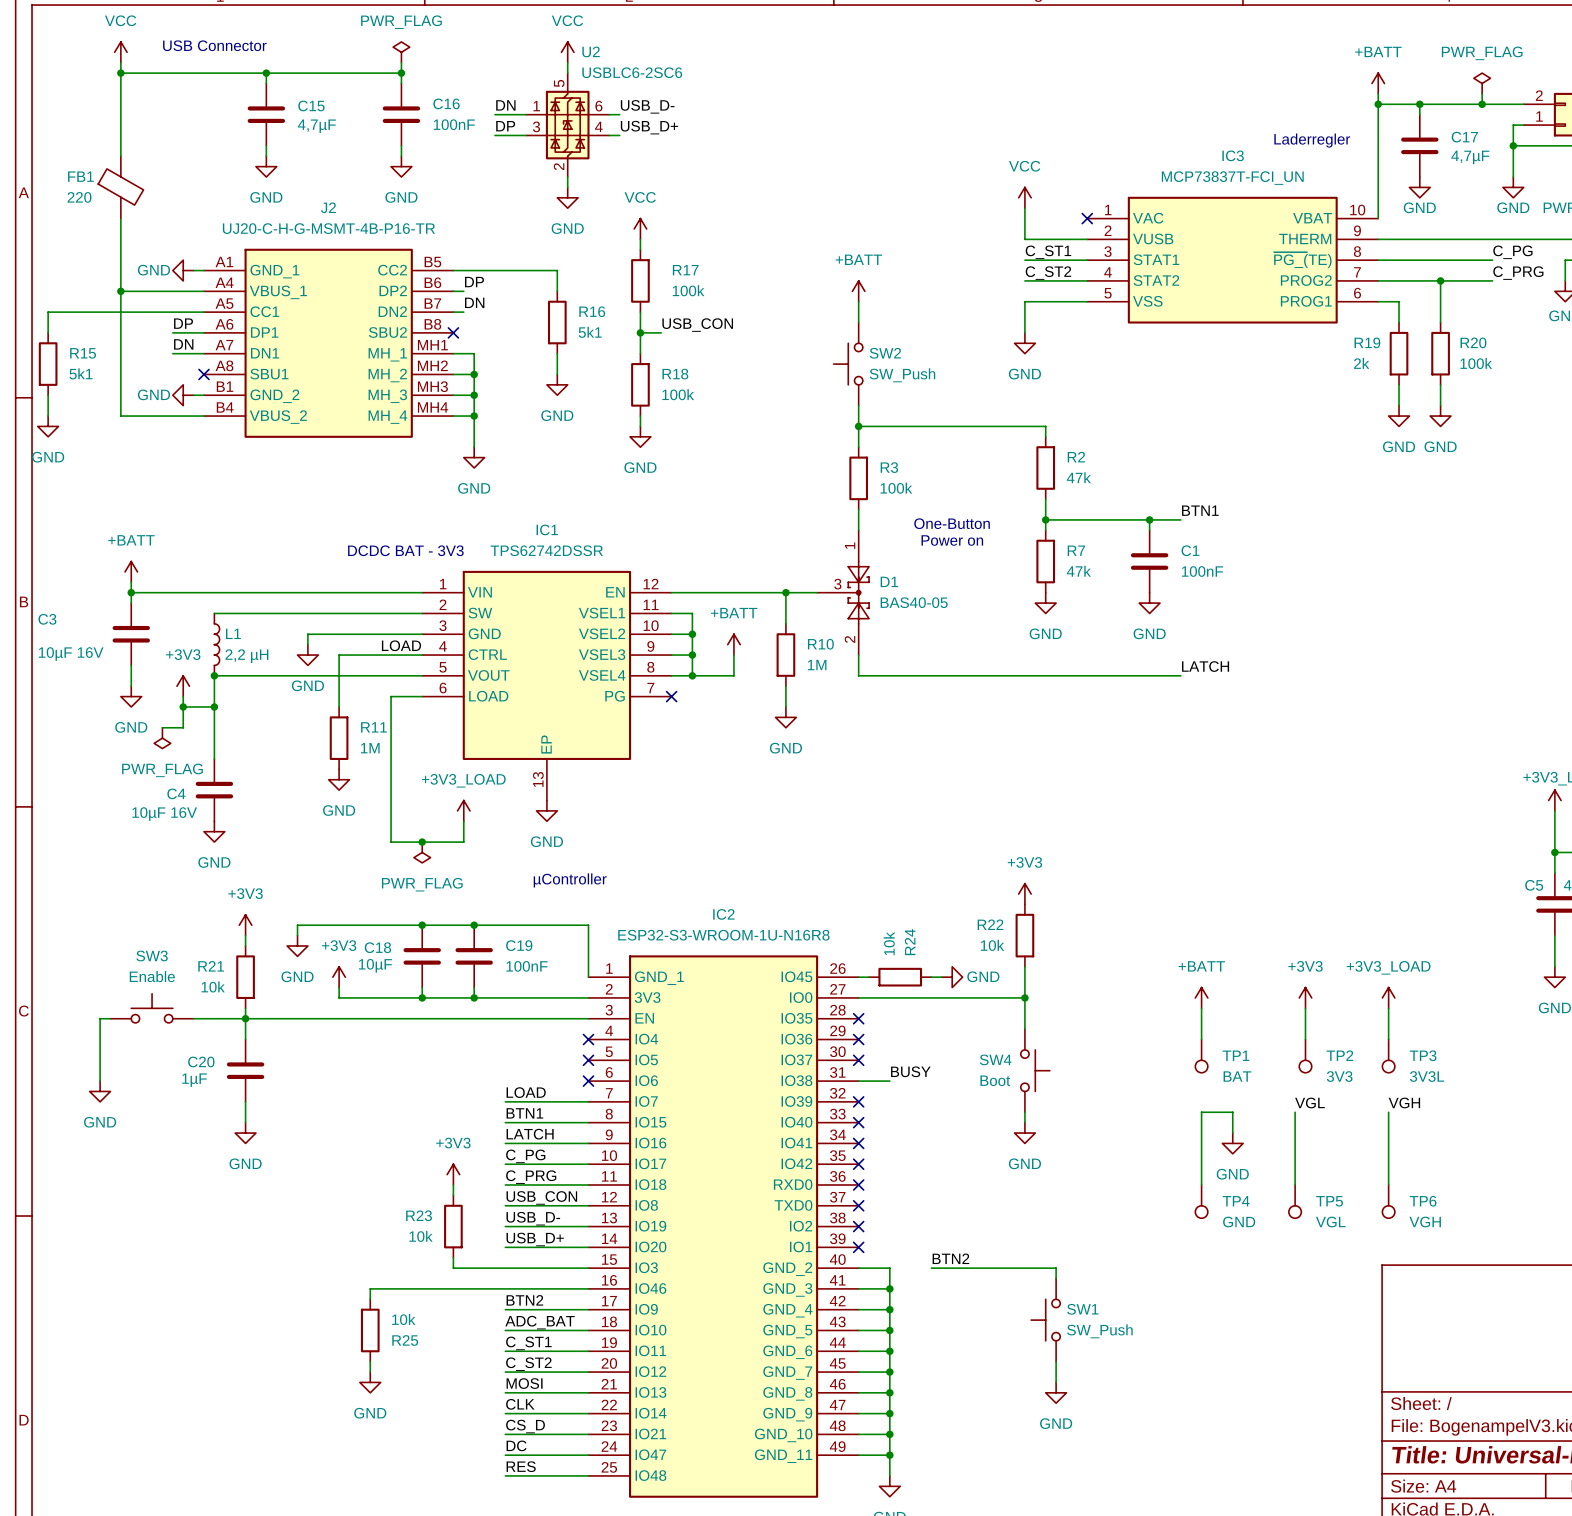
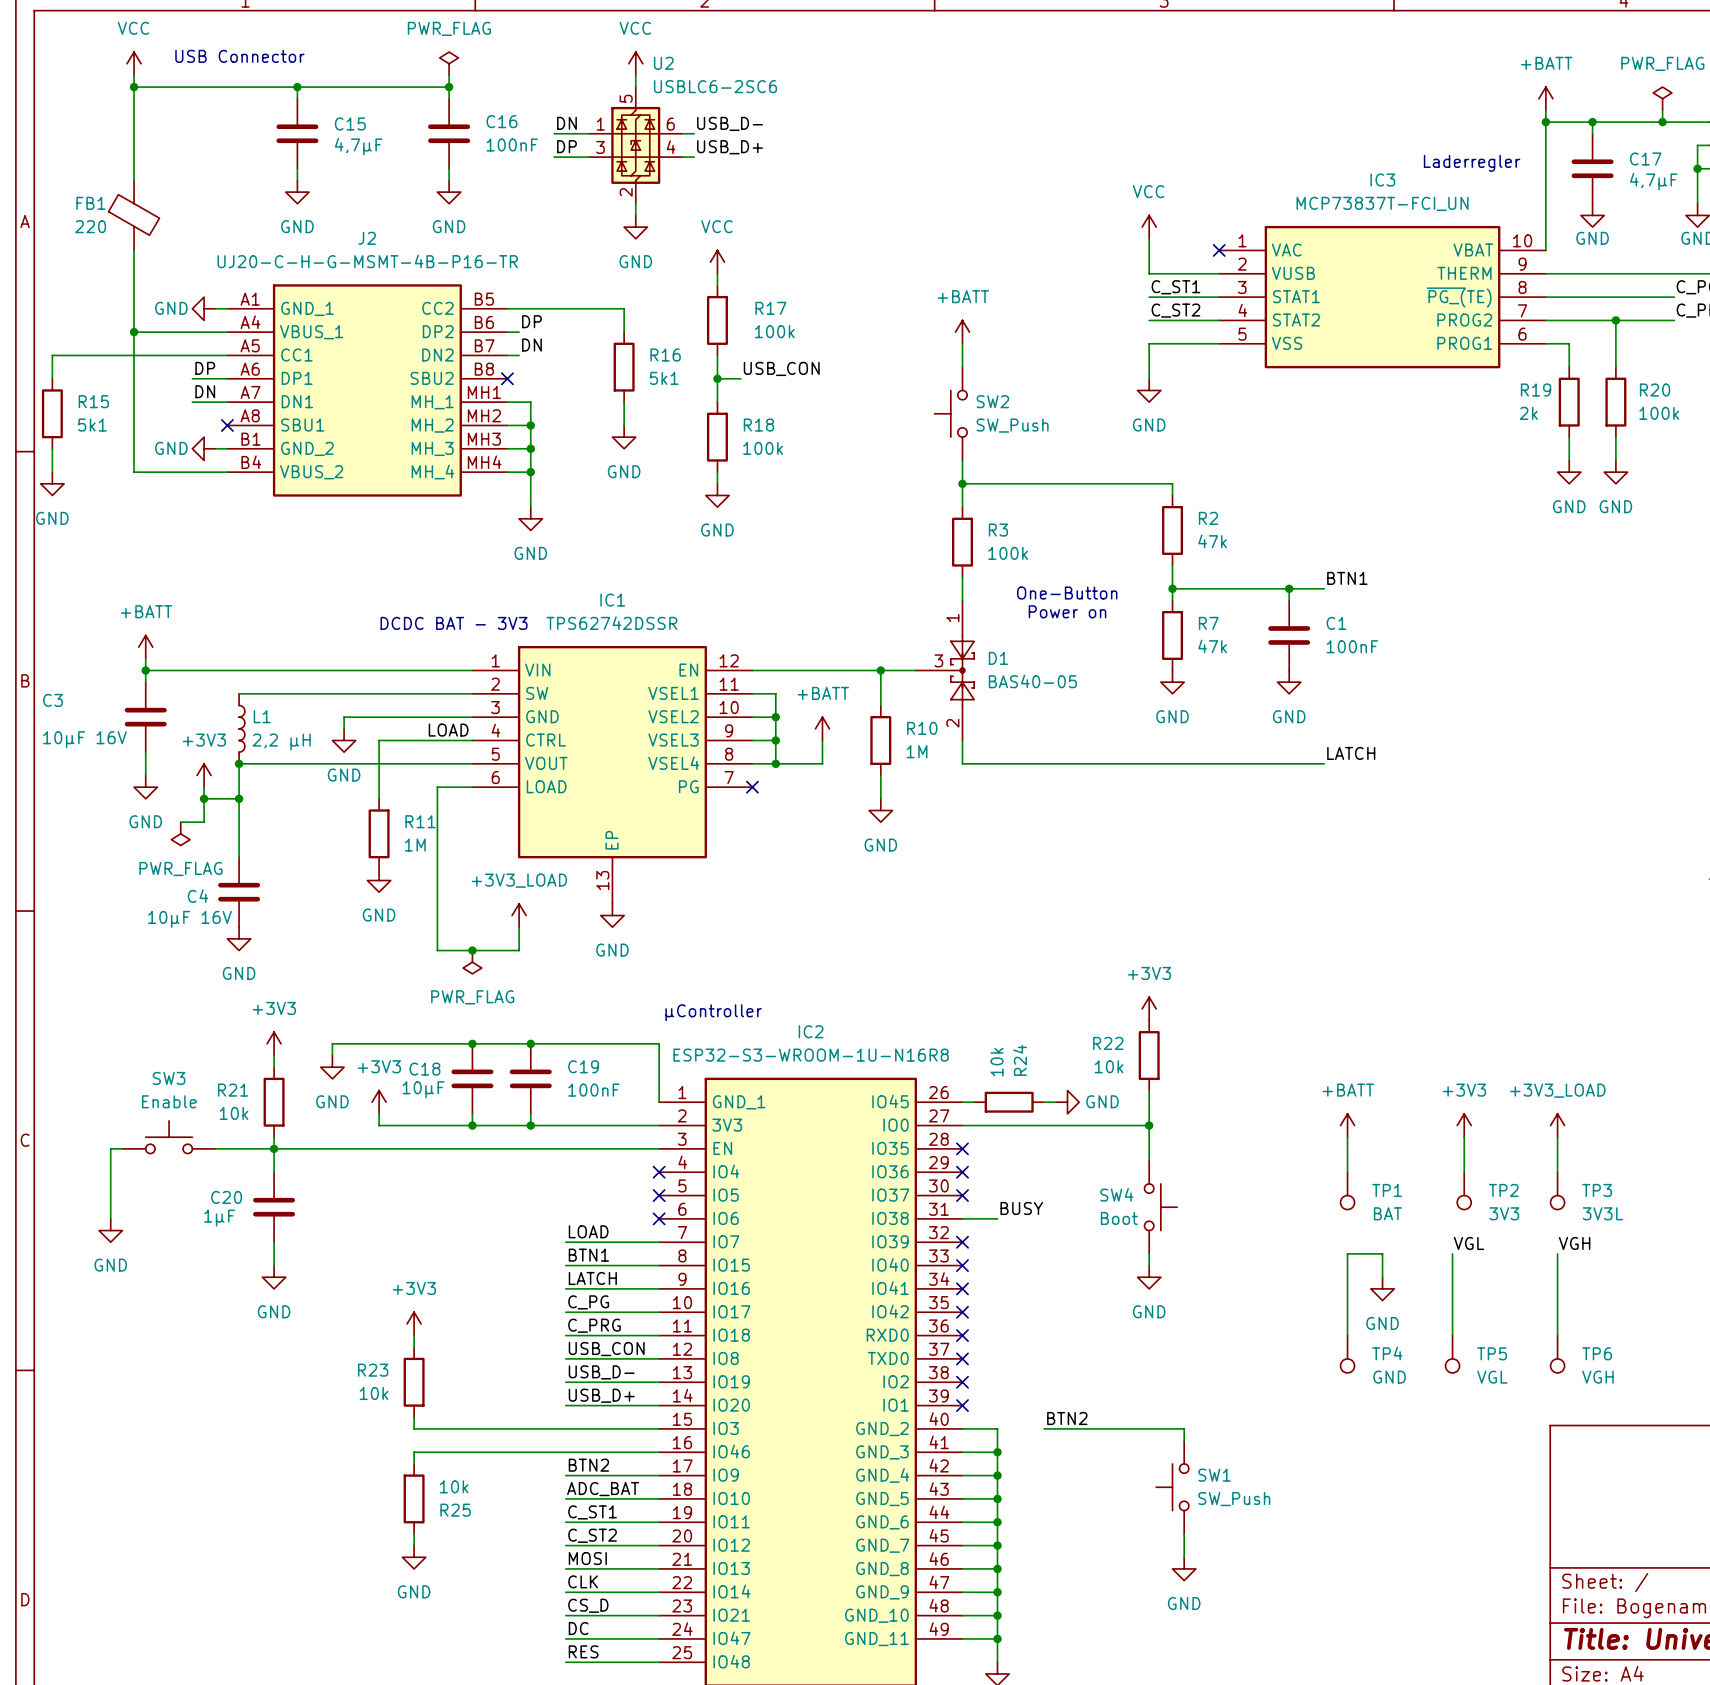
text position: µController (570, 880) -> µController (713, 1012)
power symbol position: +3V3 (453, 1174) -> +3V3 (414, 1323)
wire: (453, 1185) (453, 1195) -> (414, 1335) (414, 1347)
R23 position: (453, 1226) -> (414, 1382)
wire: (453, 1257) (453, 1268) -> (414, 1417) (414, 1428) (507, 1428)

